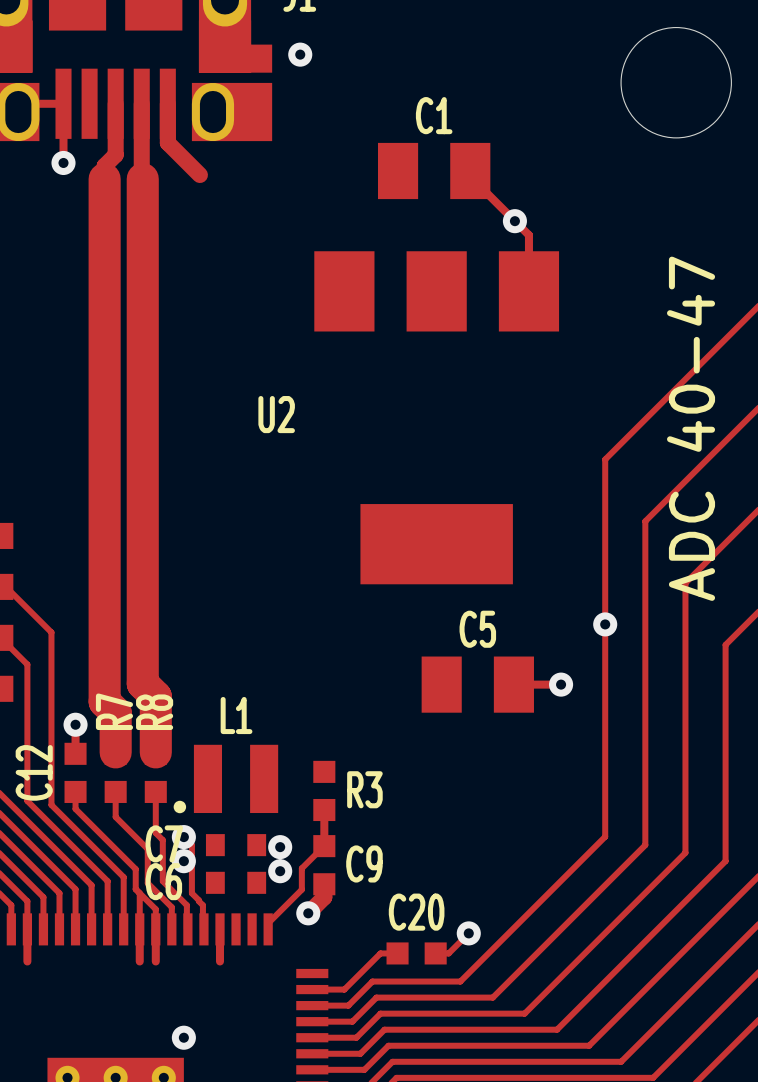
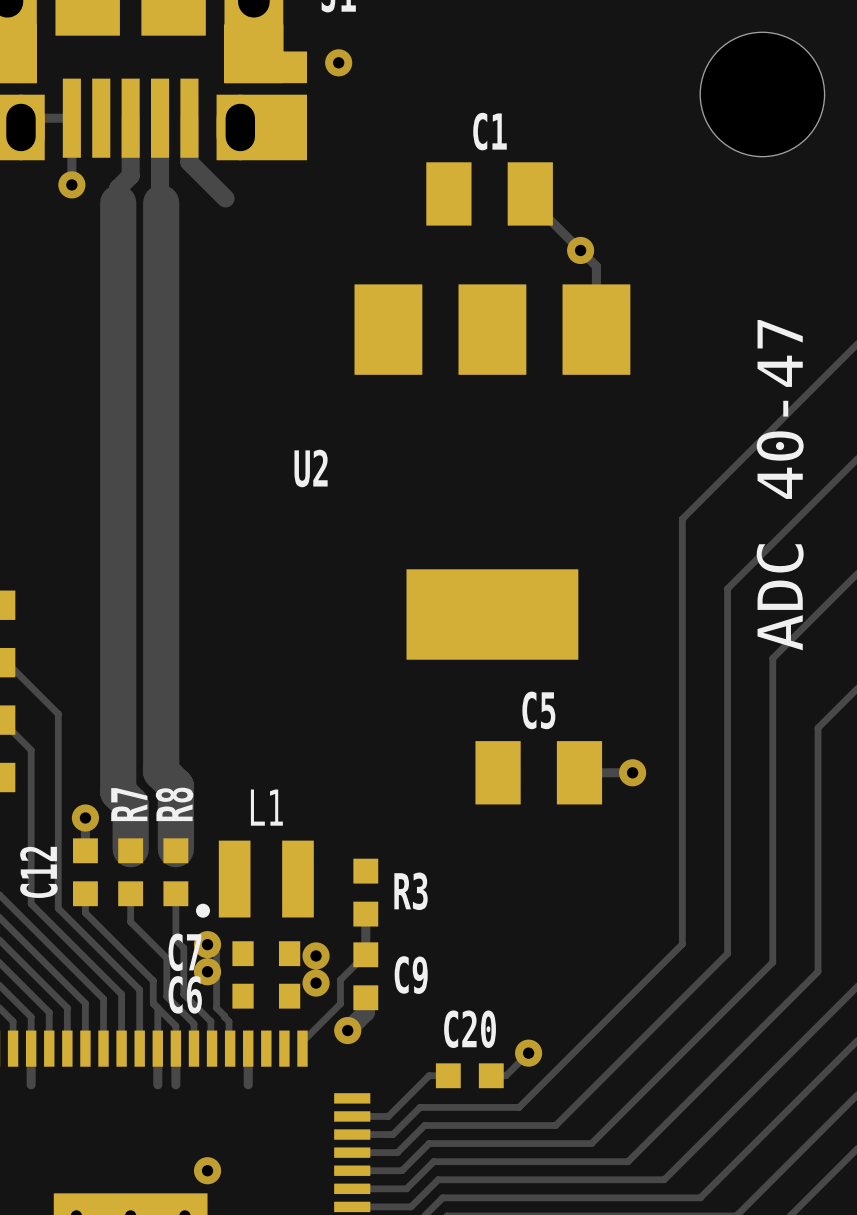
via: (605, 624) -> none

